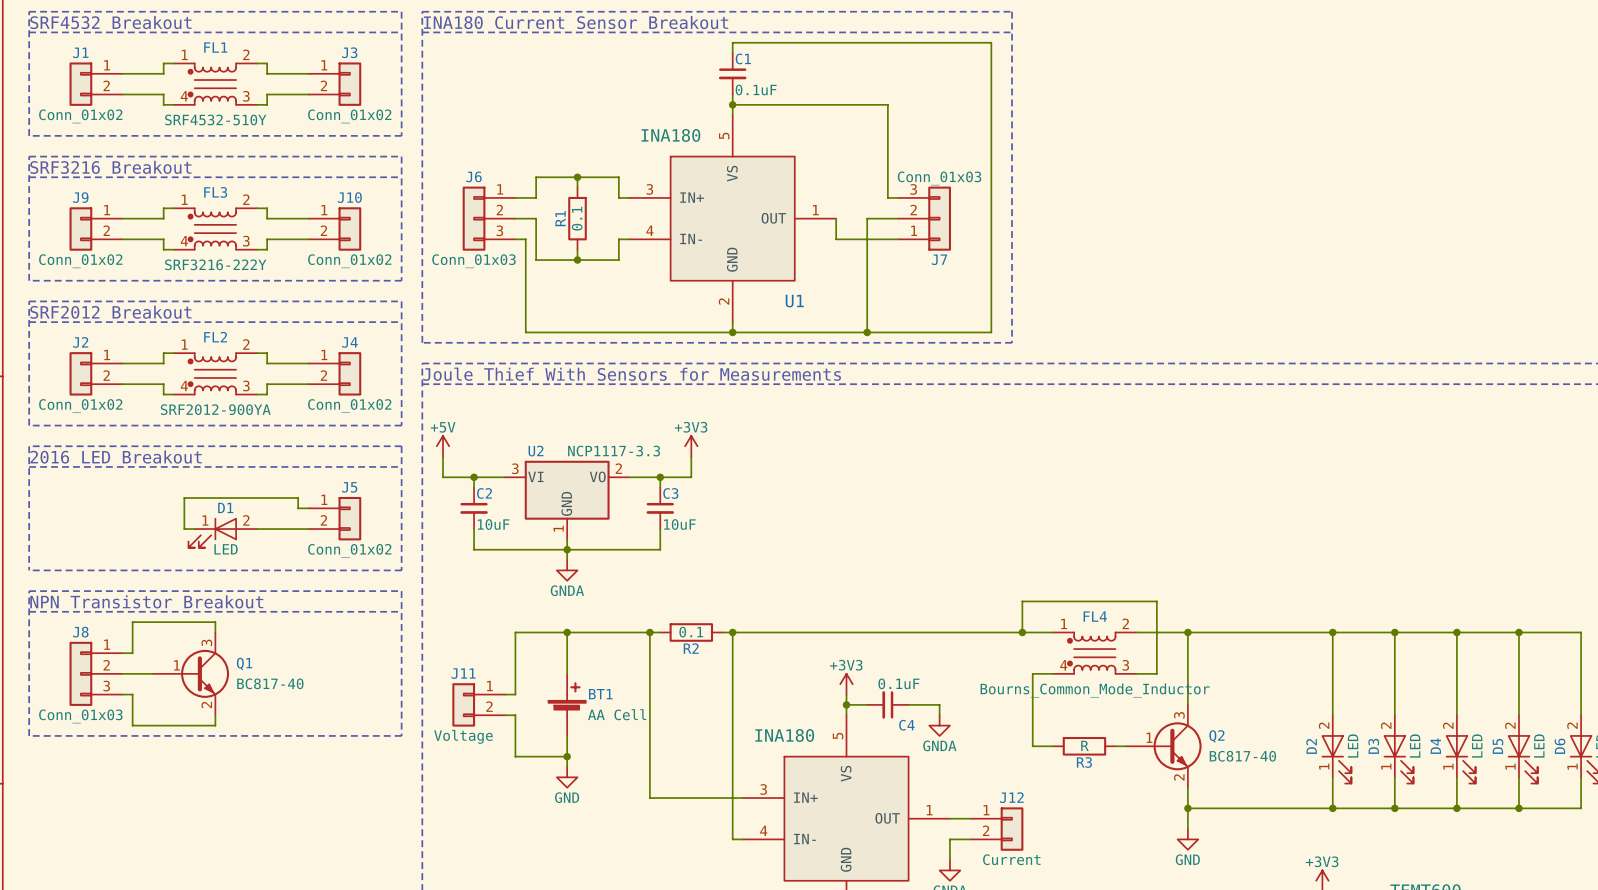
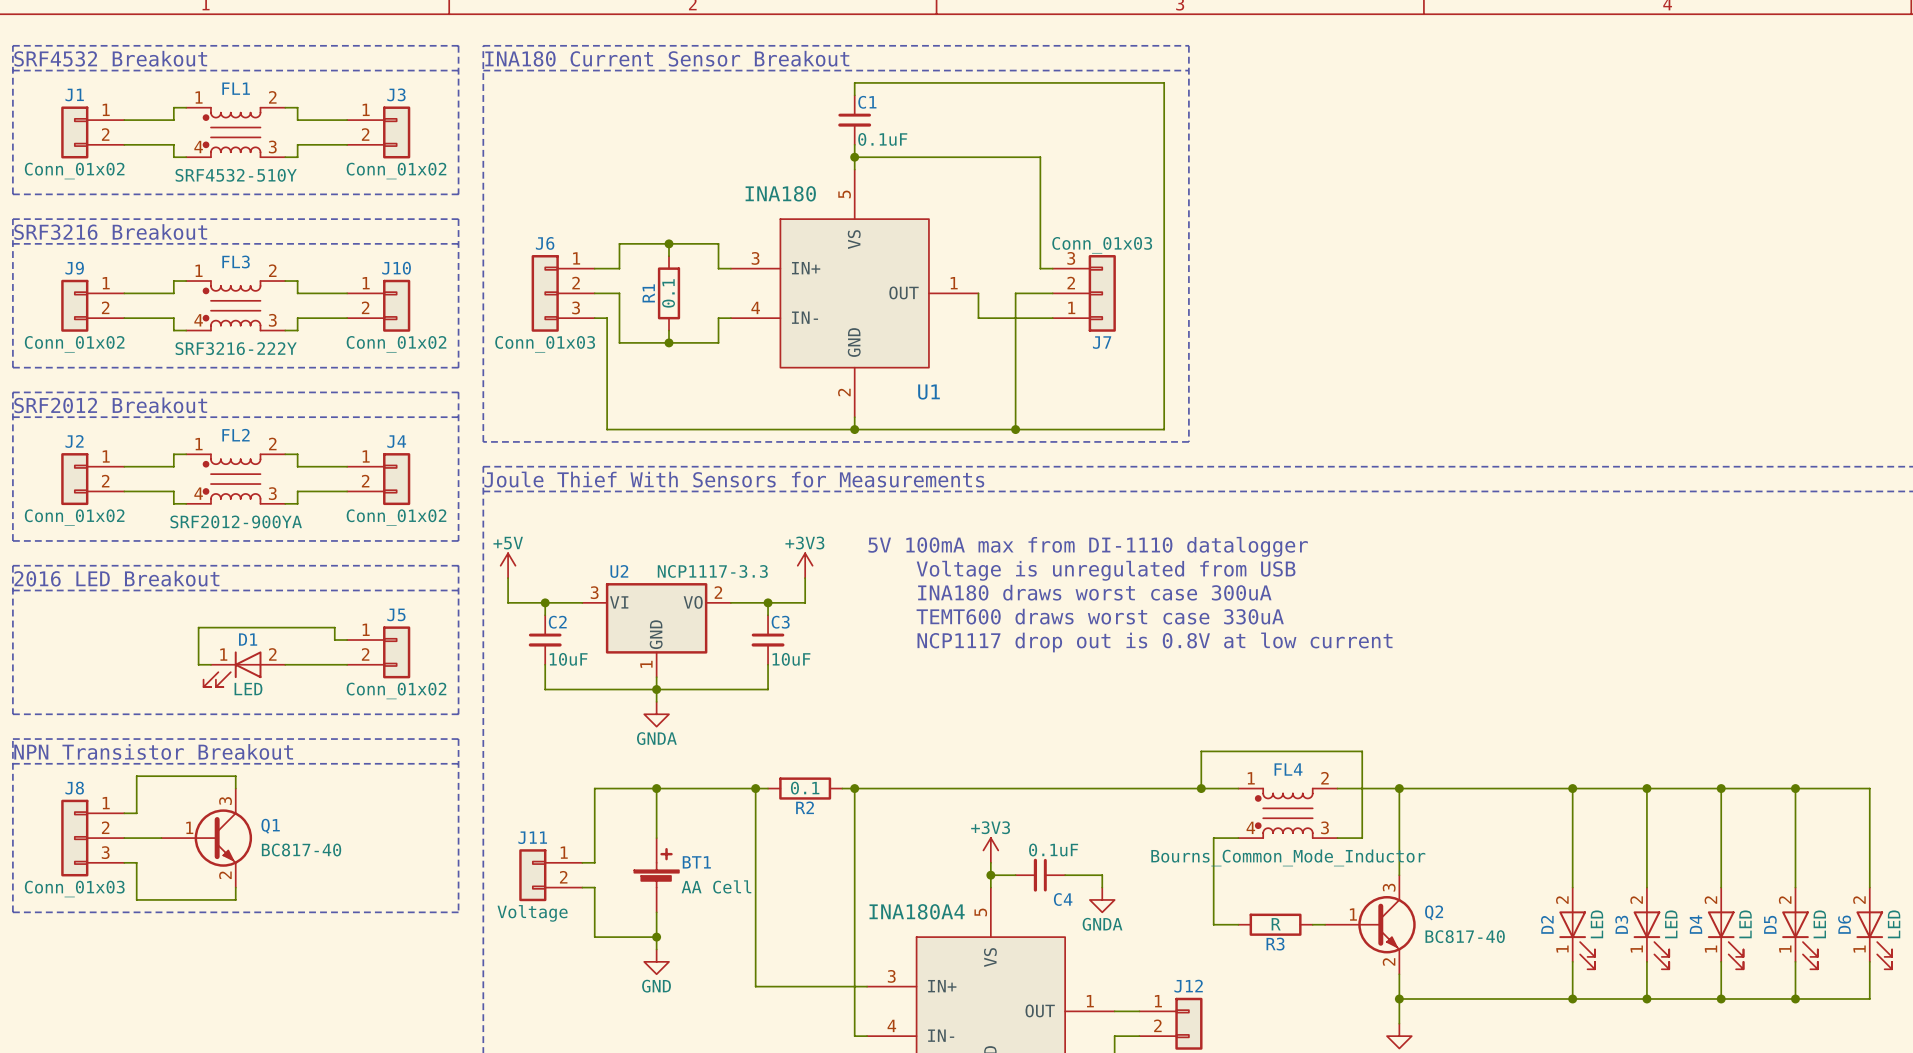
text: none -> 5V 100mA max from DI-1110 datalogger (1088, 546)
text: none -> Voltage is unregulated from USB (1106, 570)
text: none -> INA180 draws worst case 300uA (1094, 592)
text: none -> TEMT600 draws worst case 330uA (1100, 616)
text: none -> NCP1117 drop out is 0.8V at low current (1155, 642)
part value: INA180 (784, 735) -> INA180A4 (917, 911)

